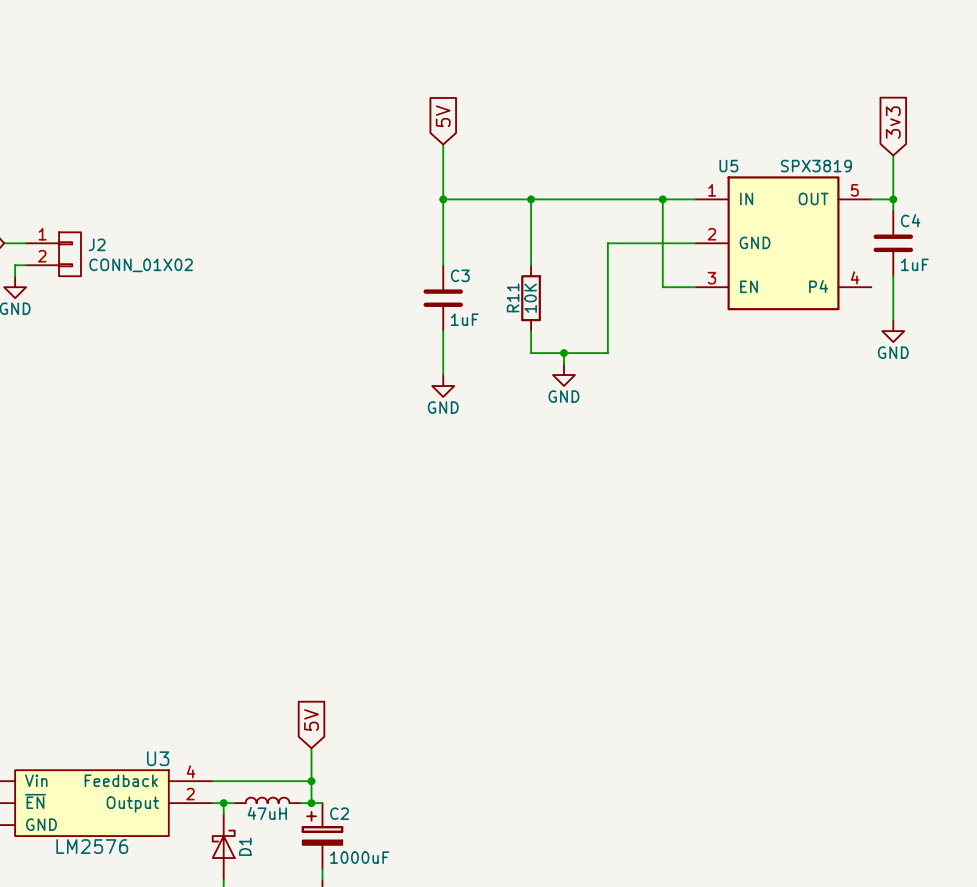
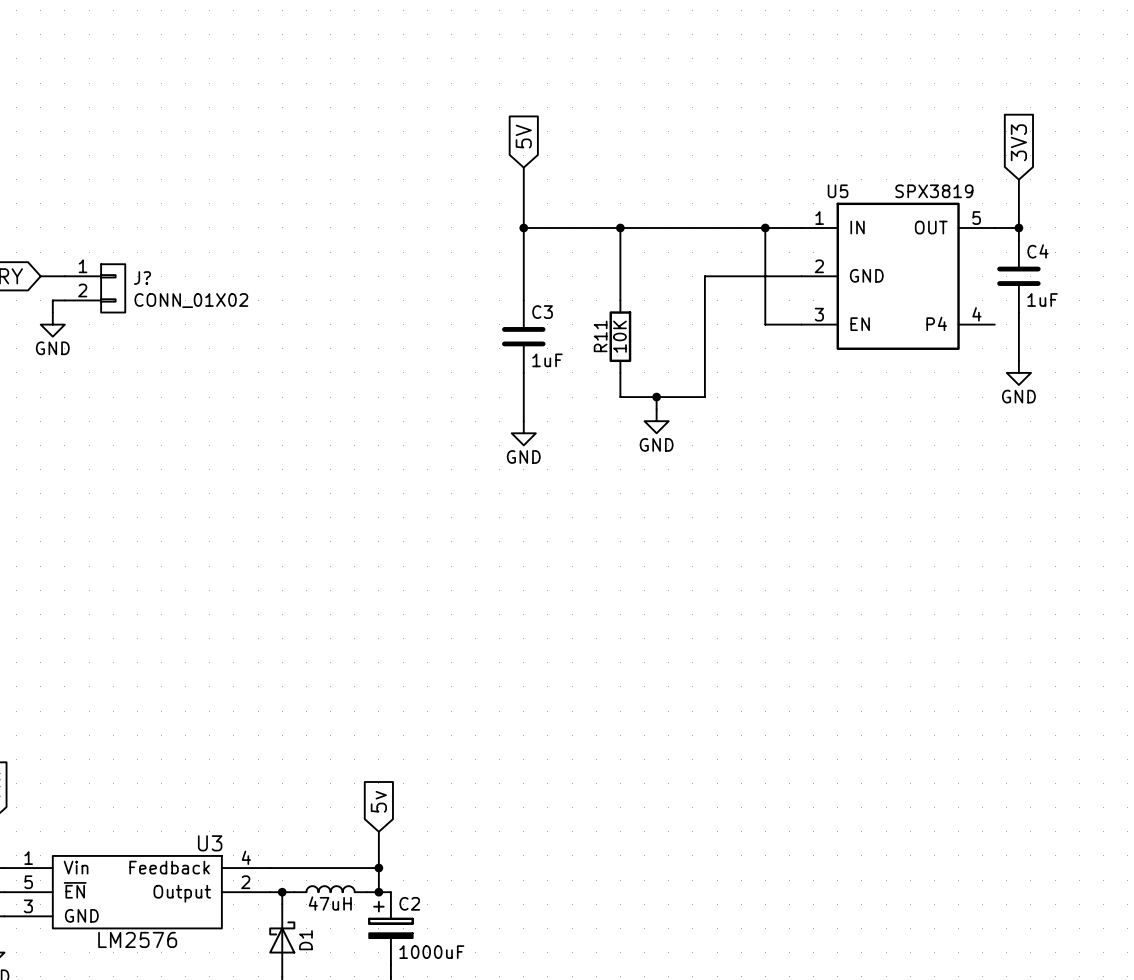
global label: 3v3 (893, 122) -> 3V3 (1018, 142)
J2 name: J2 (97, 244) -> J? (142, 278)
global label: 5V (311, 720) -> 5v (378, 801)

